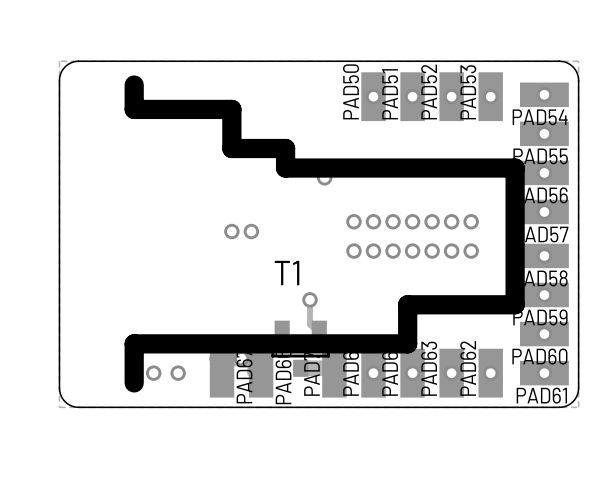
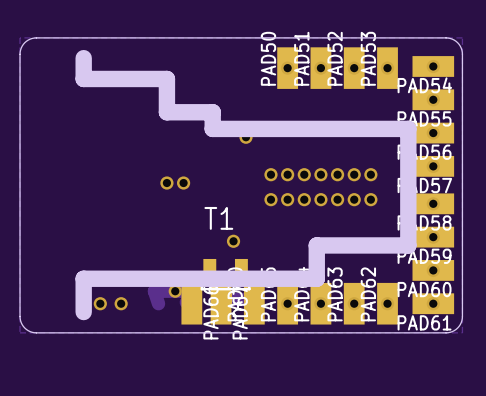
track: (310, 299) (310, 324) (314, 329) (319, 329) -> none
PAD67 position: (222, 373) -> (221, 303)

